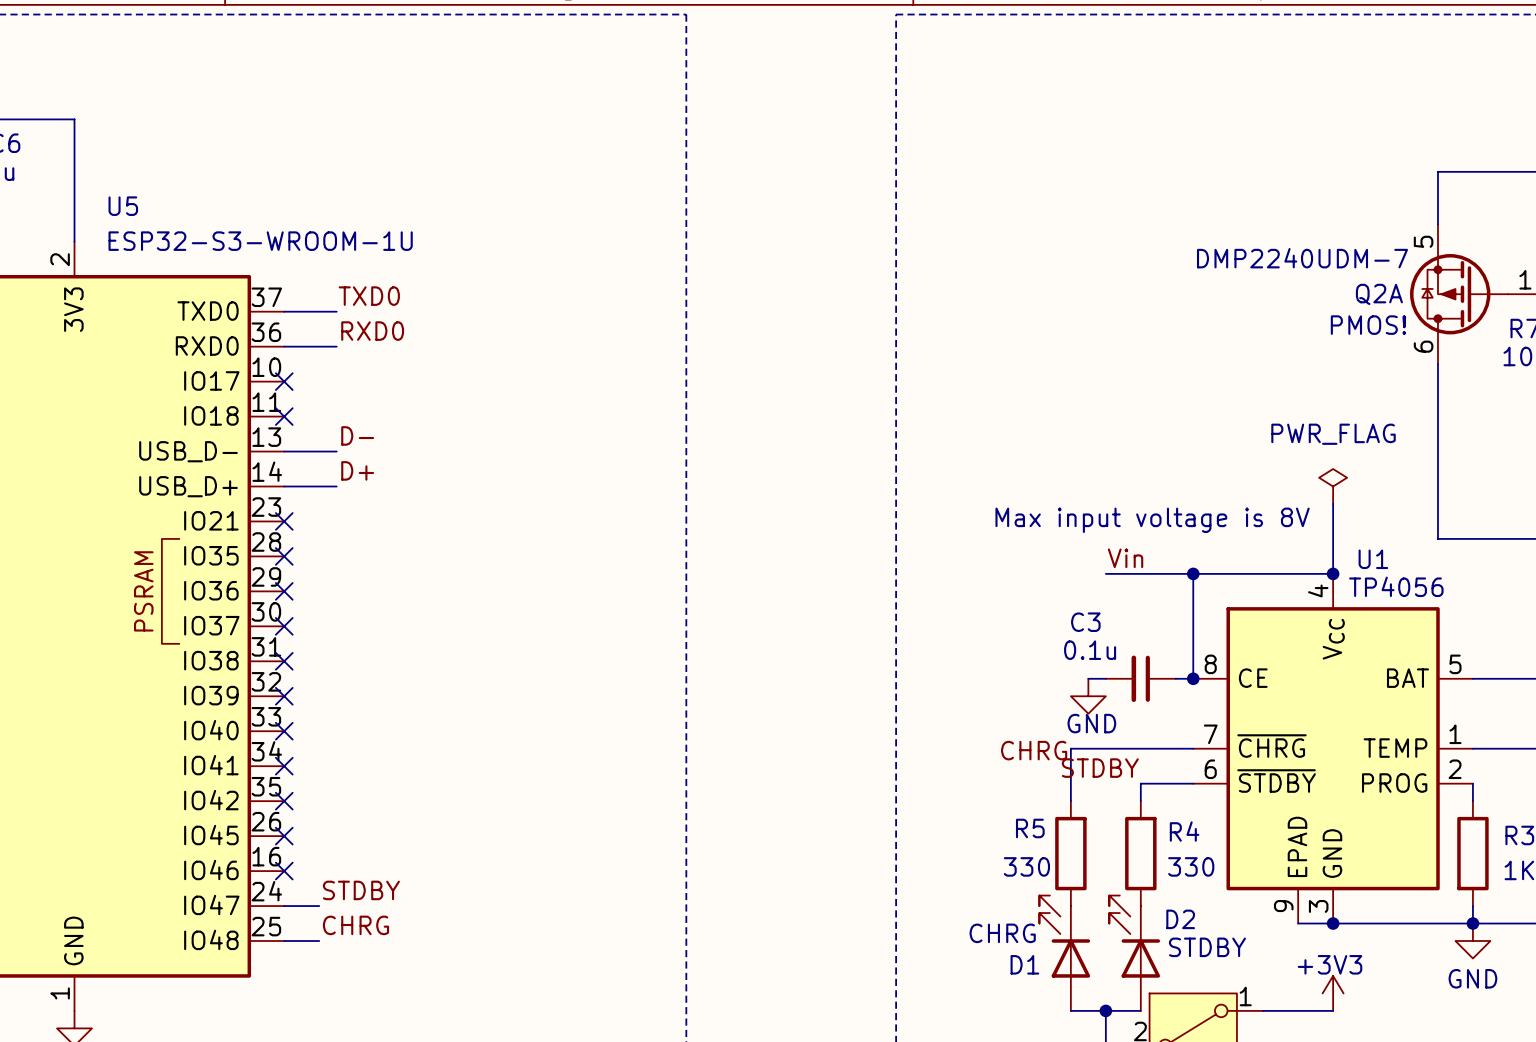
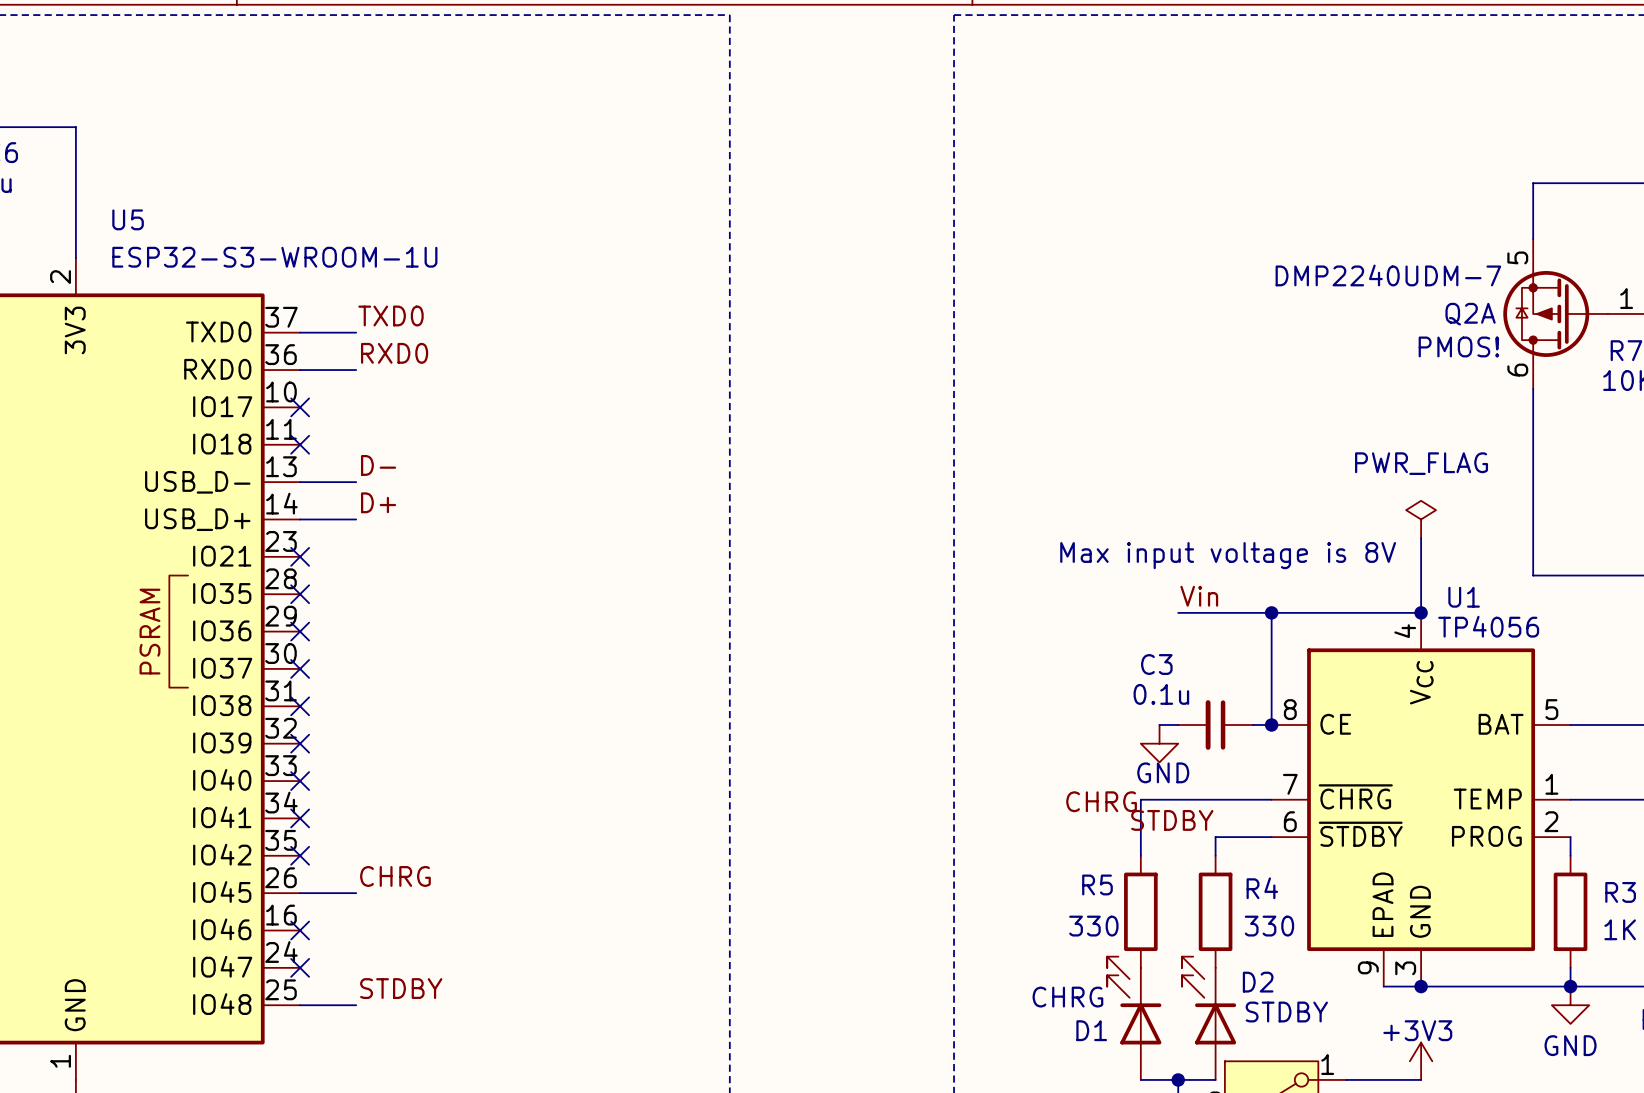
wire: none -> (300, 893) (356, 893)
no-connect mark position: (284, 836) -> (300, 967)
label position: STDBY (361, 890) -> STDBY (401, 988)
wire: (284, 906) (319, 906) -> none
label position: CHRG (355, 925) -> CHRG (395, 876)
wire: none -> (337, 1005) (356, 1005)

